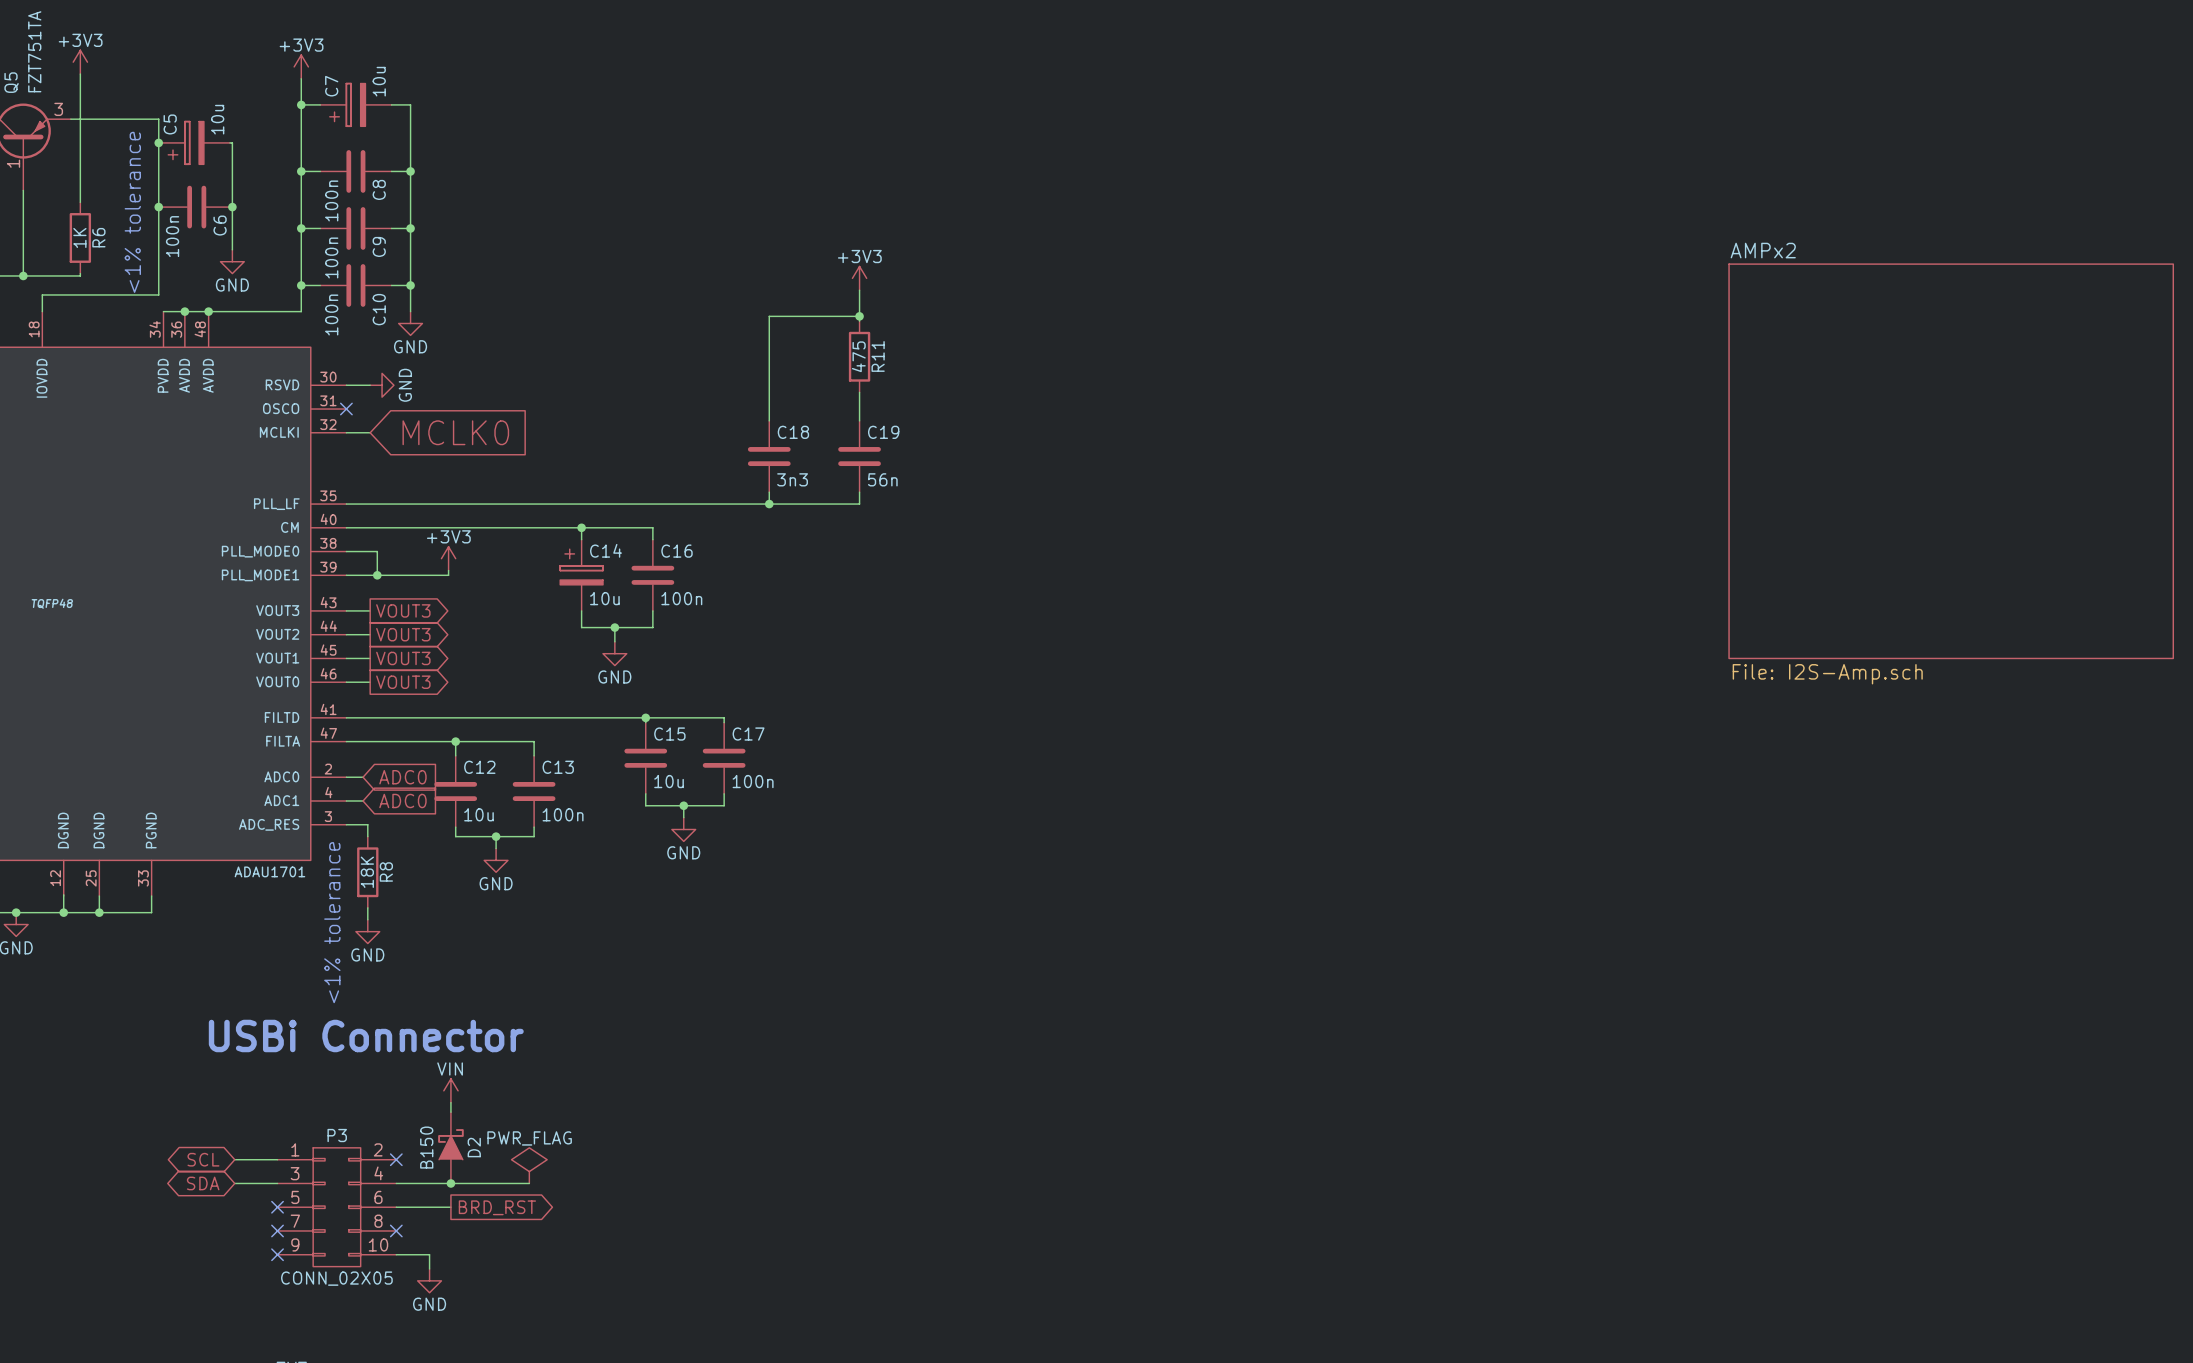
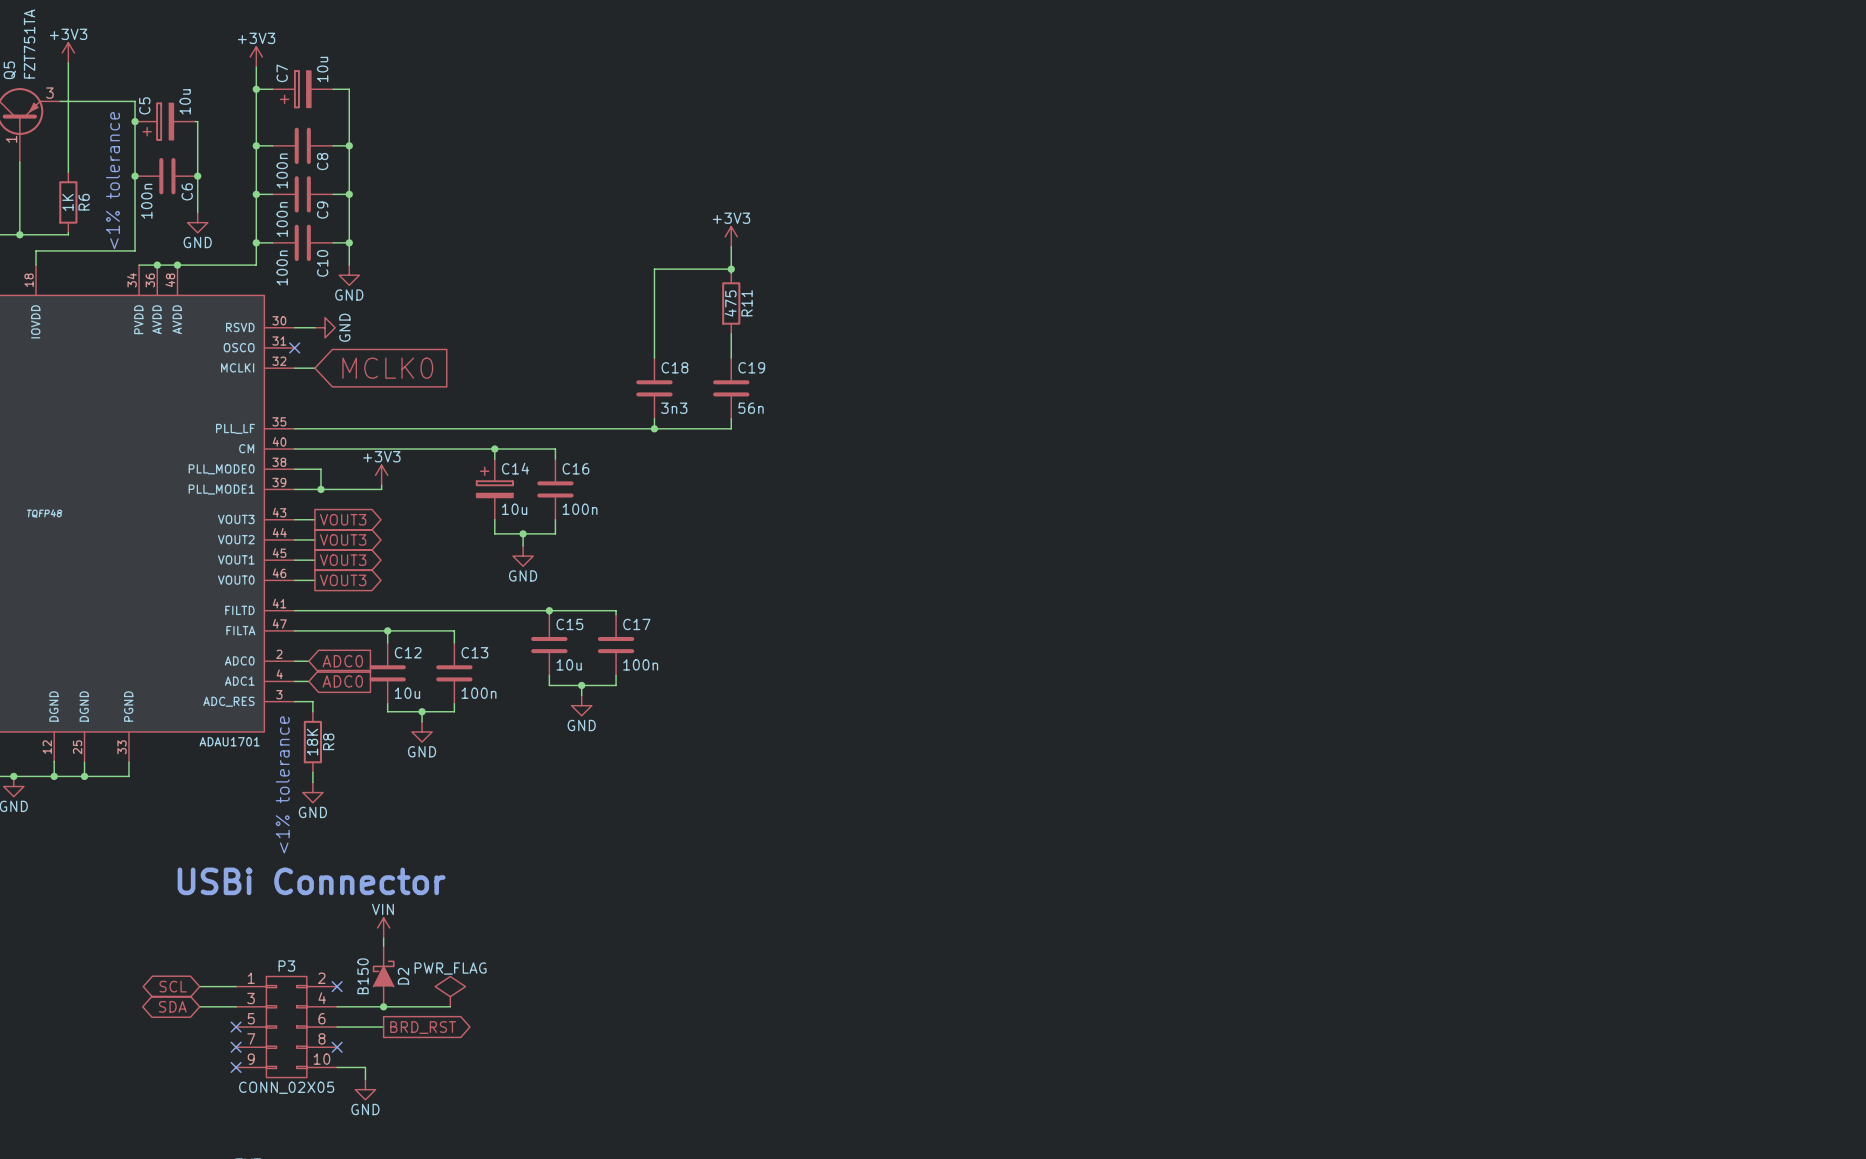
sheet AMPx2: File: I2S-Amp.sch (1951, 461) -> none

